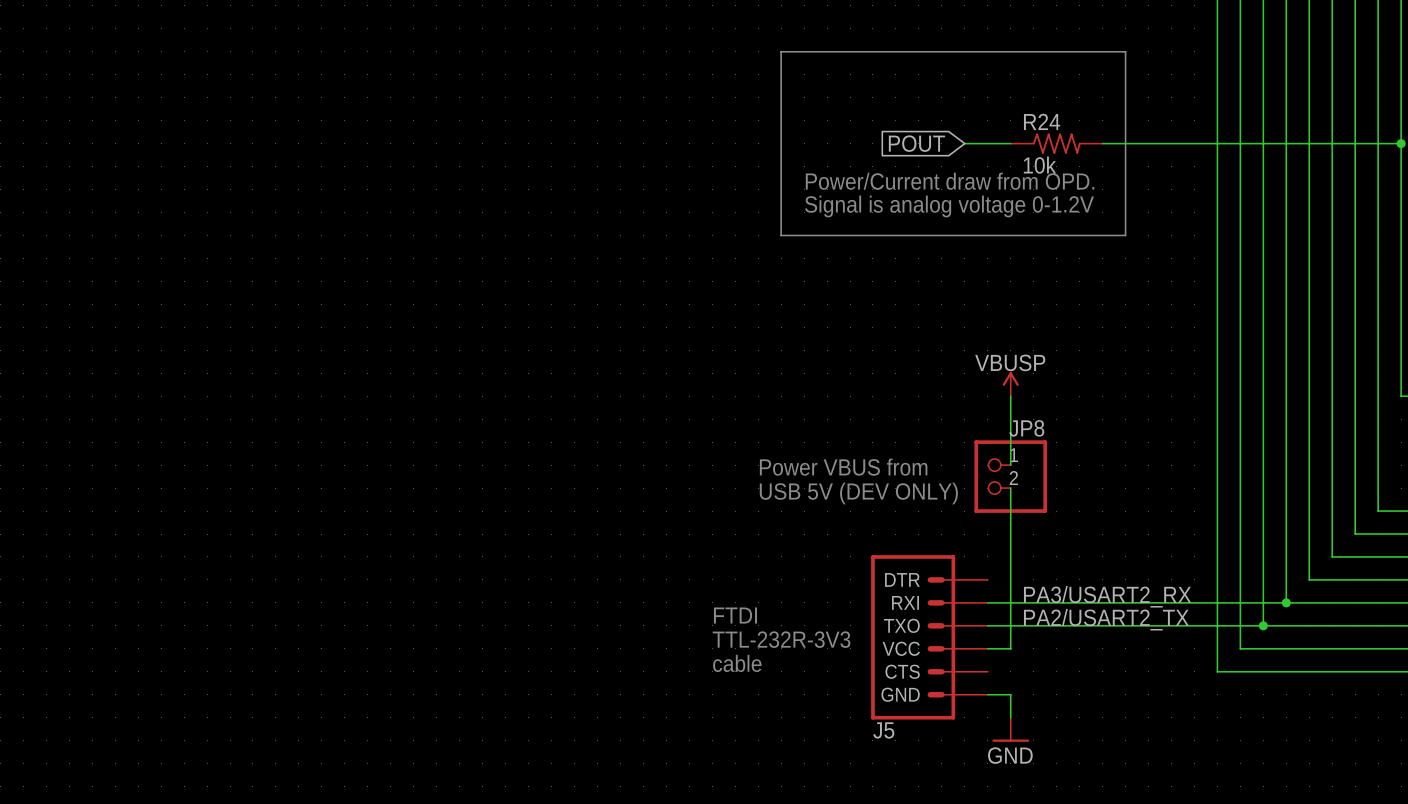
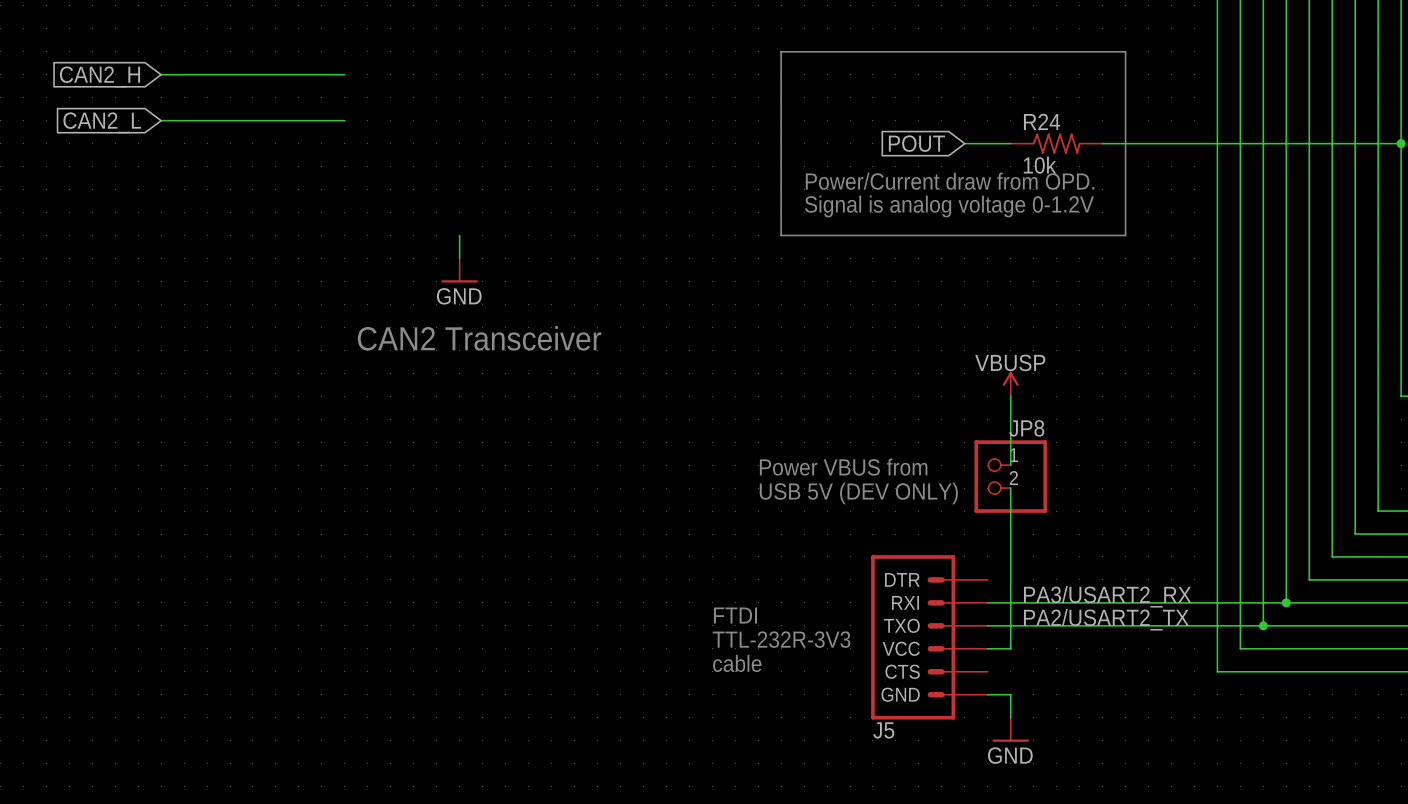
wire: none -> (161, 74) (344, 74)
global label: none -> CAN2_H (100, 76)
wire: none -> (161, 120) (344, 120)
global label: none -> CAN2_L (102, 122)
wire: none -> (459, 235) (459, 258)
power symbol: none -> GND (459, 270)
text: none -> CAN2 Transceiver (479, 338)

